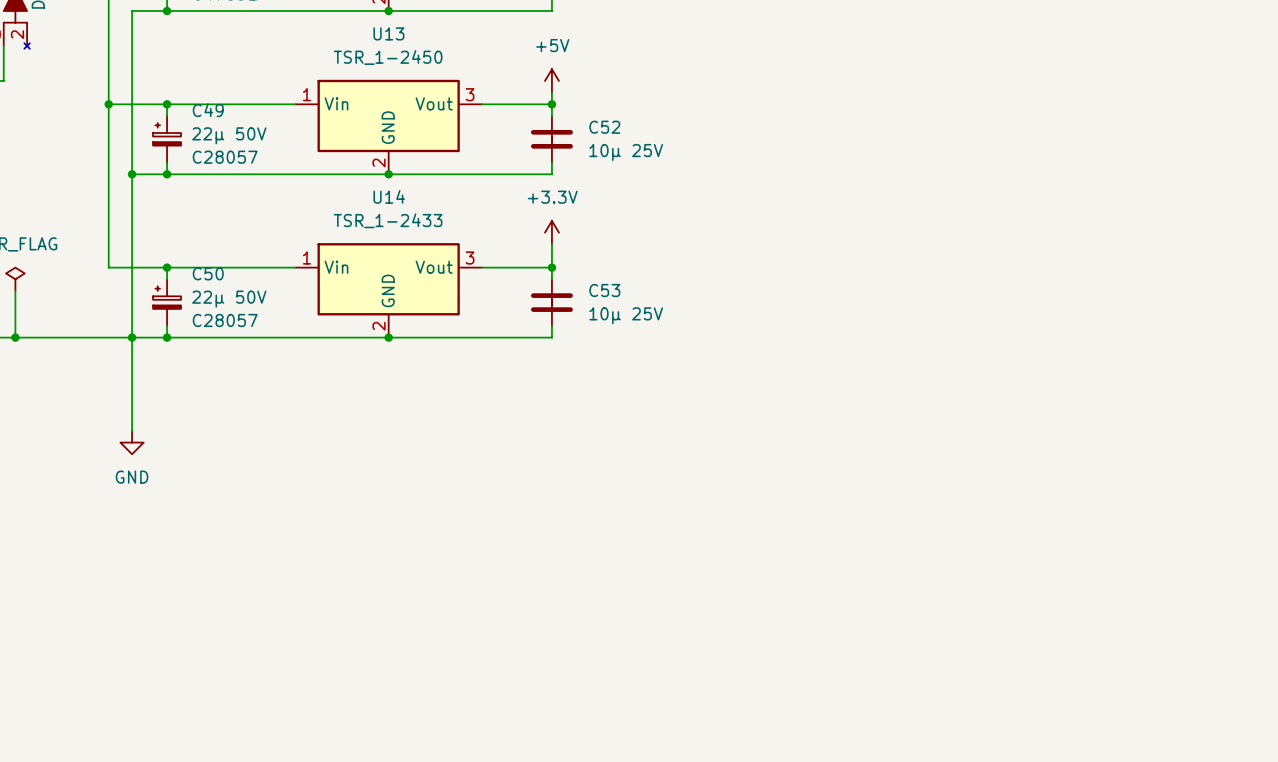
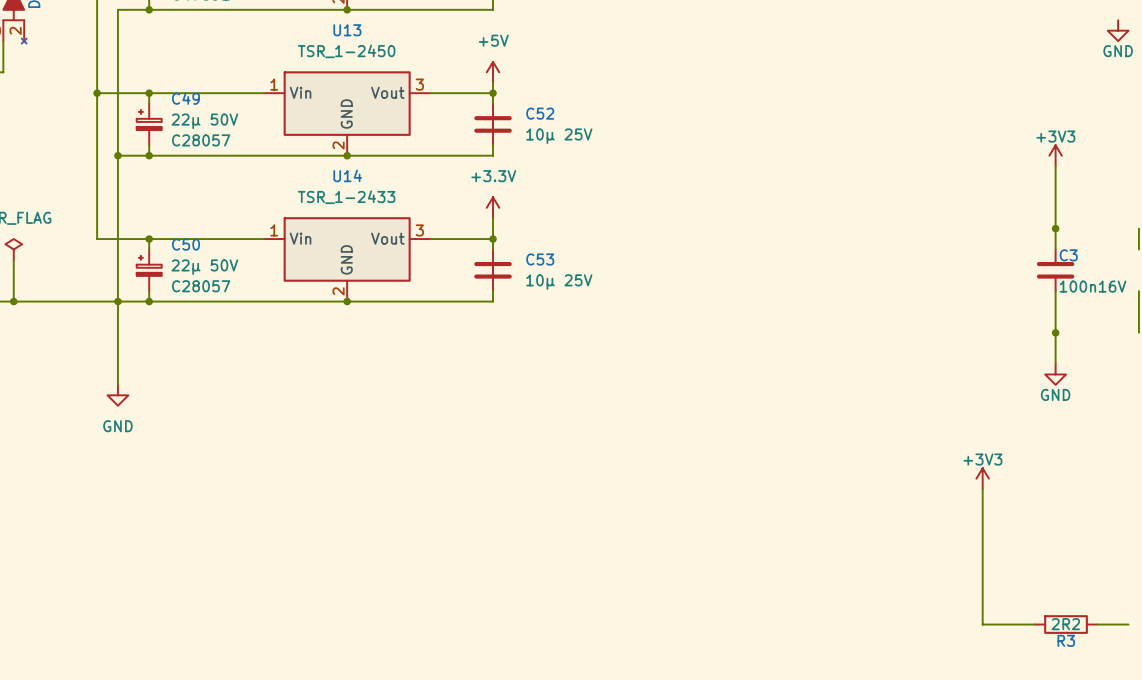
power symbol: none -> GND (1118, 30)
power symbol: none -> +3V3 (1055, 155)
wire: none -> (1055, 166) (1055, 249)
junction: none -> (1055, 228)
wire: none -> (1138, 228) (1138, 249)
C3: none -> 100n16V (1055, 270)
wire: none -> (1055, 291) (1055, 364)
wire: none -> (1138, 291) (1138, 332)
junction: none -> (1055, 332)
power symbol: none -> GND (1055, 374)
power symbol: none -> +3V3 (982, 478)
wire: none -> (982, 489) (982, 624) (1034, 624)
R3: none -> 2R2 (1066, 624)
wire: none -> (1097, 624) (1128, 624)

